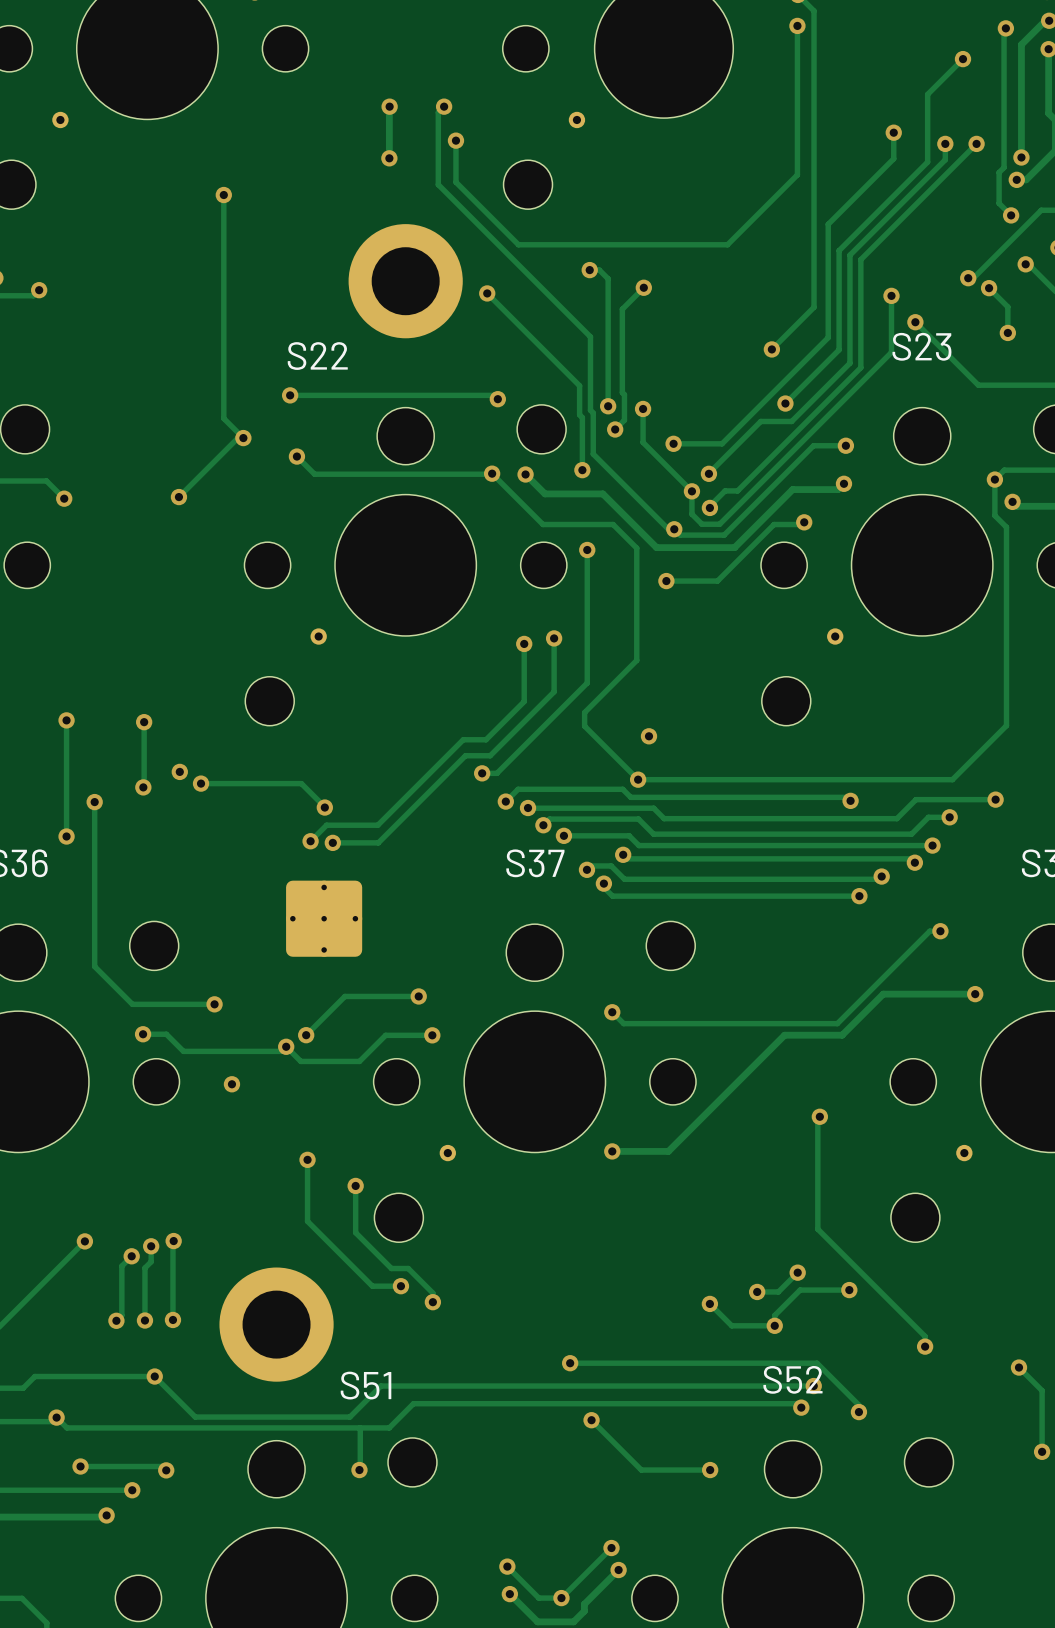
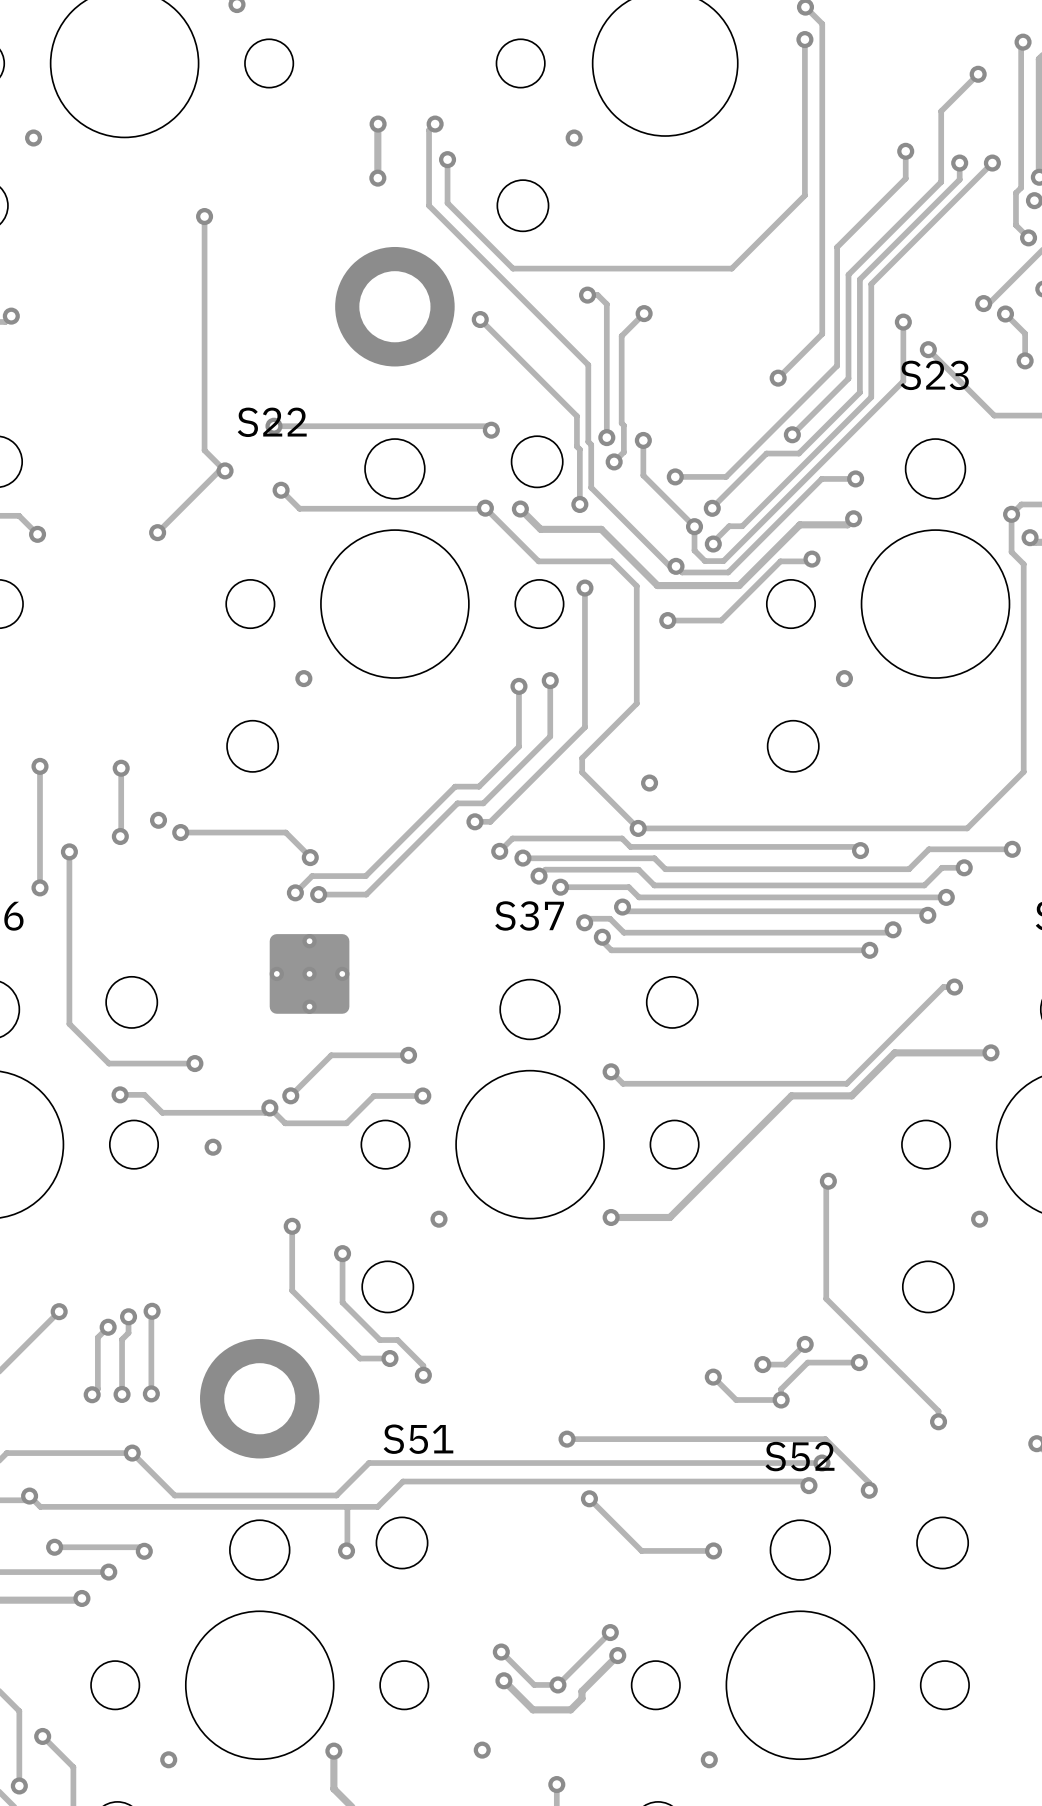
S22 name position: S22 (317, 356) -> S22 (272, 422)
S51 name position: S51 (366, 1385) -> S51 (418, 1439)

